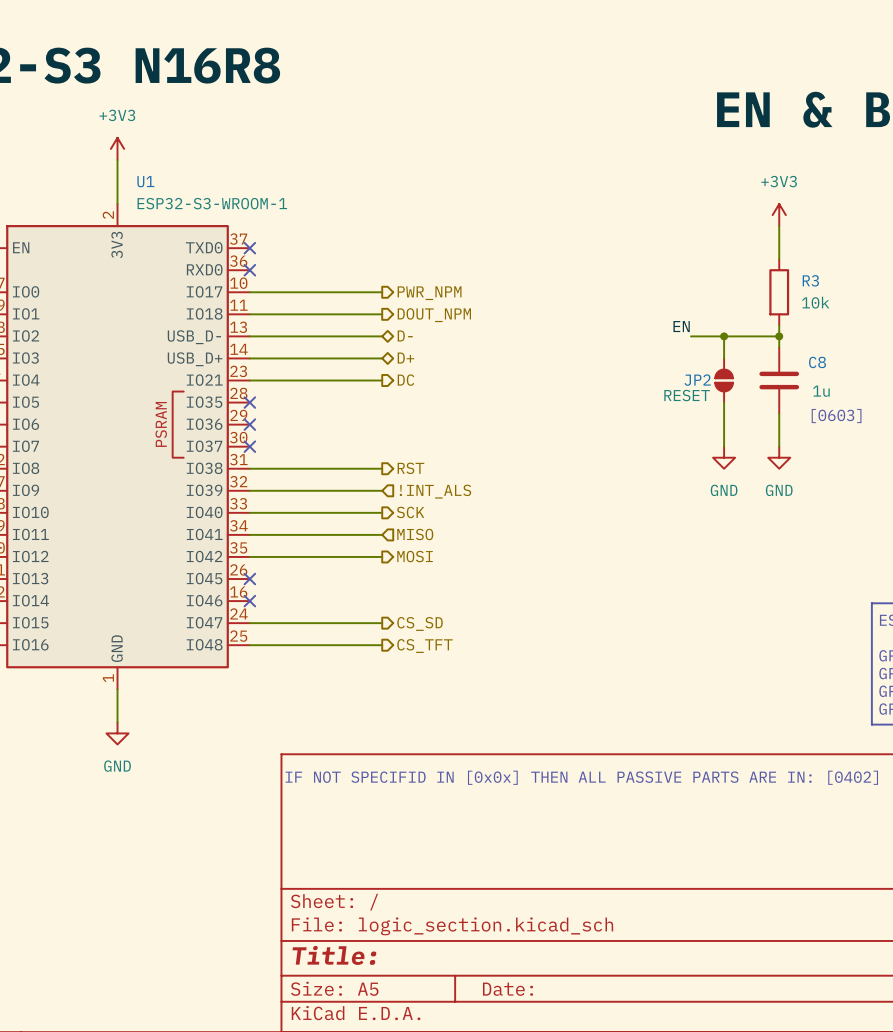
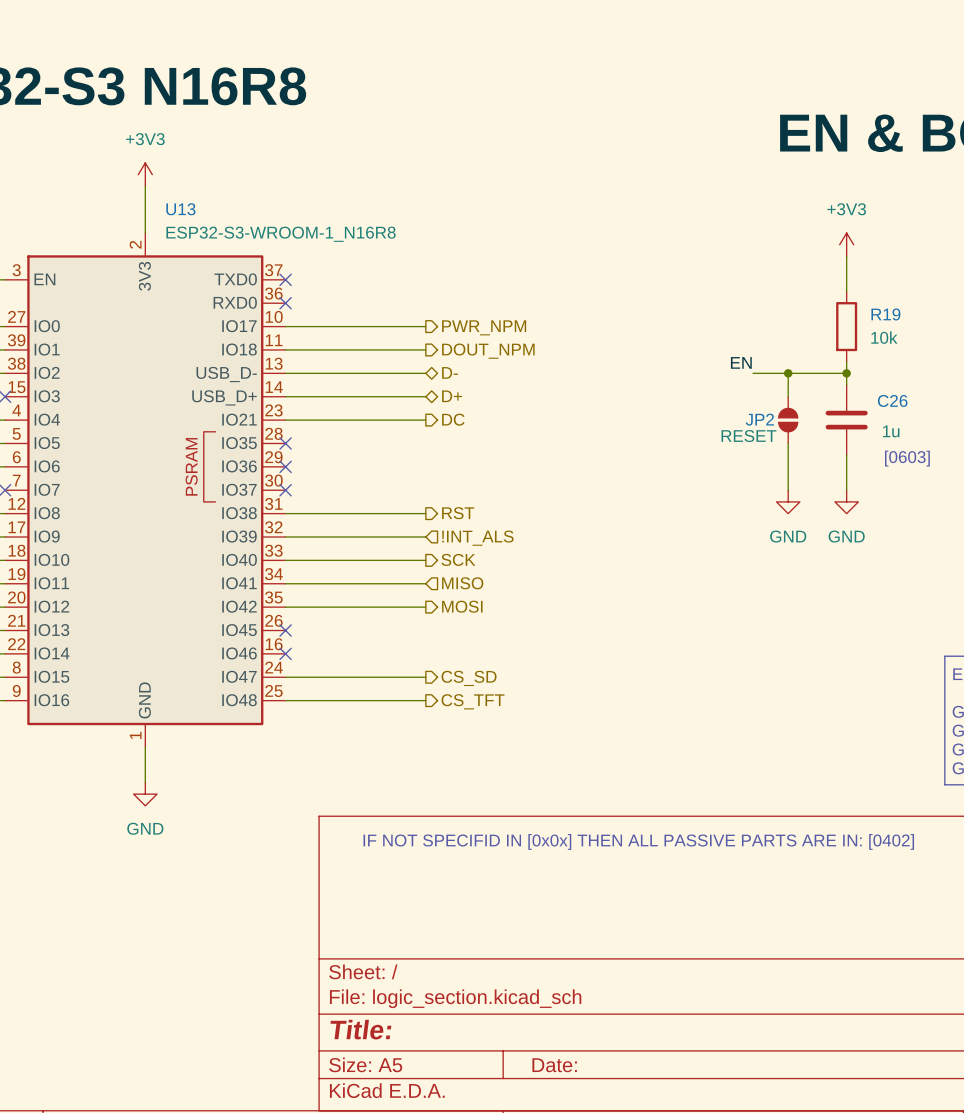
U1 name: U1 (145, 181) -> U13 (180, 209)
U1 value: ESP32-S3-WROOM-1 (212, 203) -> ESP32-S3-WROOM-1_N16R8 (281, 234)
R3 name: R3 (810, 280) -> R19 (885, 314)
C8 name: C8 (817, 362) -> C26 (892, 400)

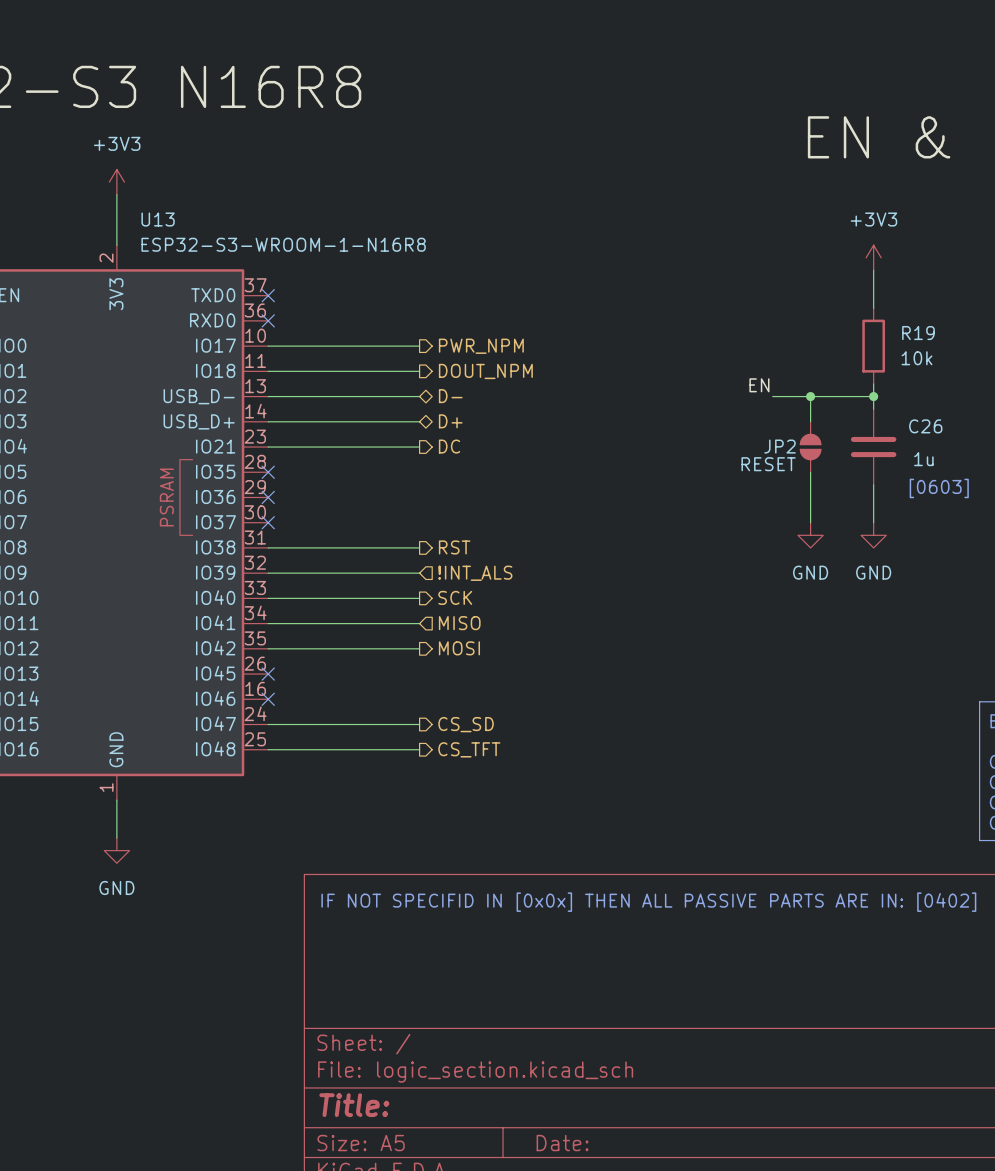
U13 value: ESP32-S3-WROOM-1_N16R8 (281, 234) -> ESP32-S3-WROOM-1-N16R8 (283, 244)

